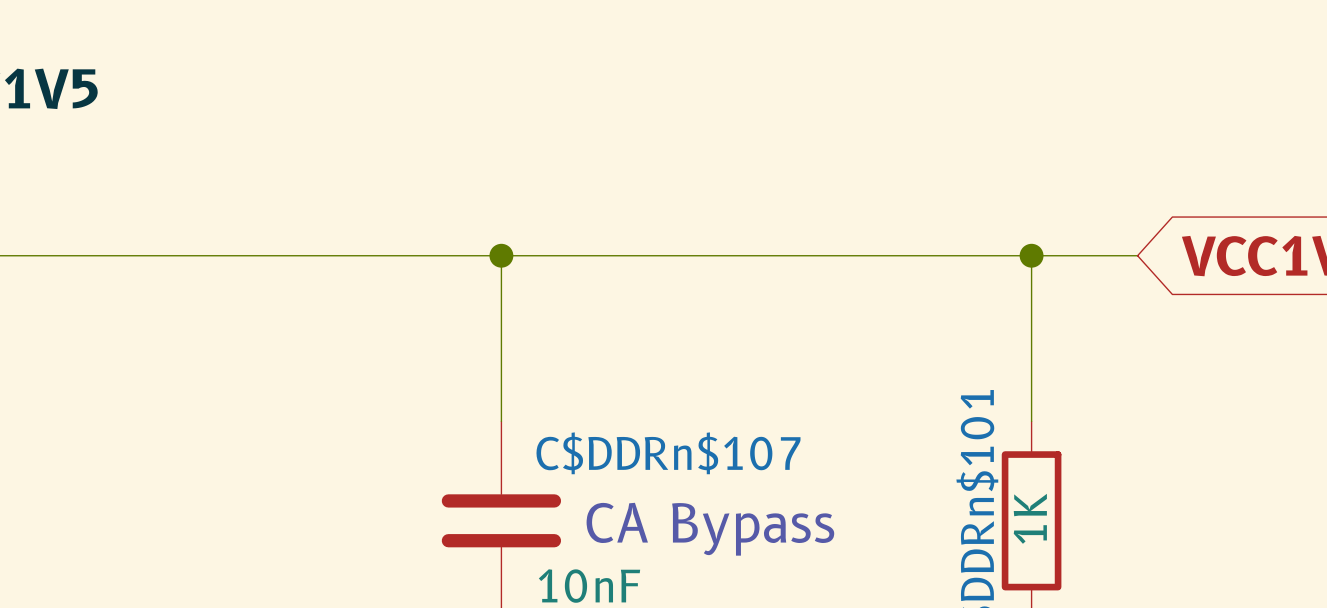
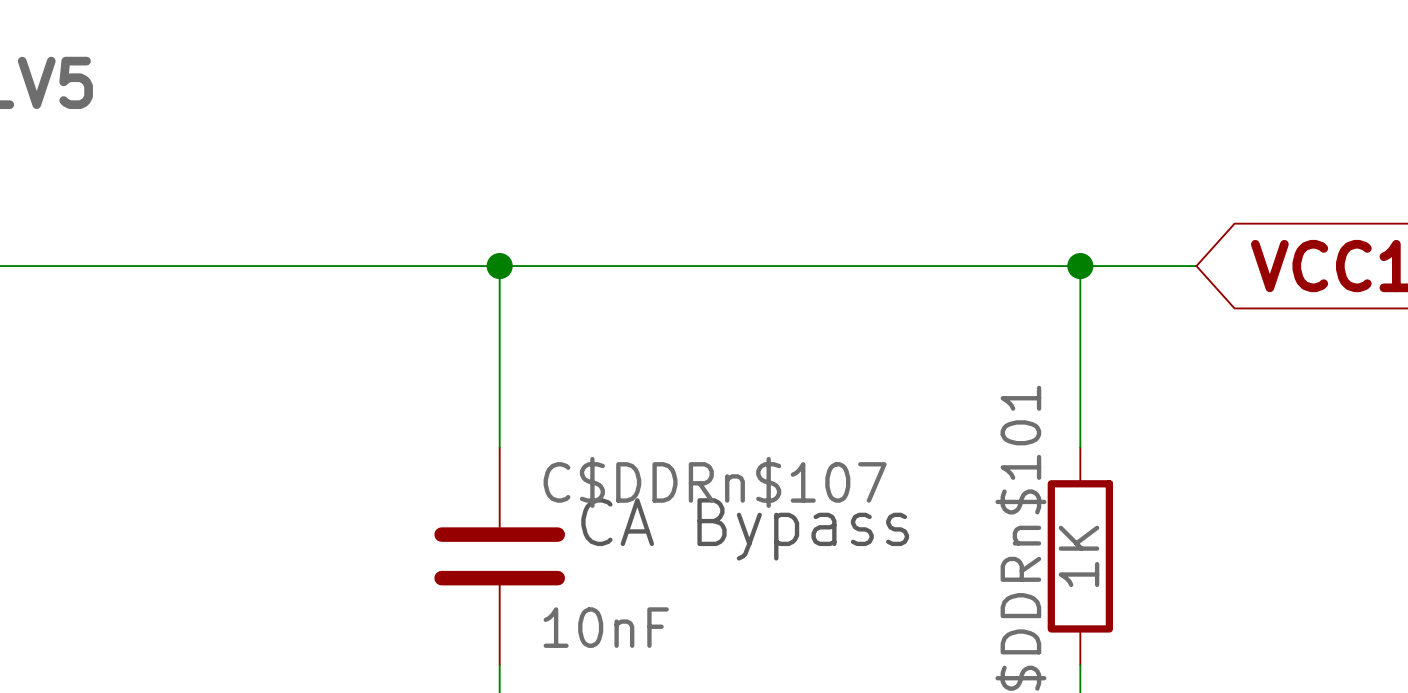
text position: CA Bypass (710, 529) -> CA Bypass (745, 529)

